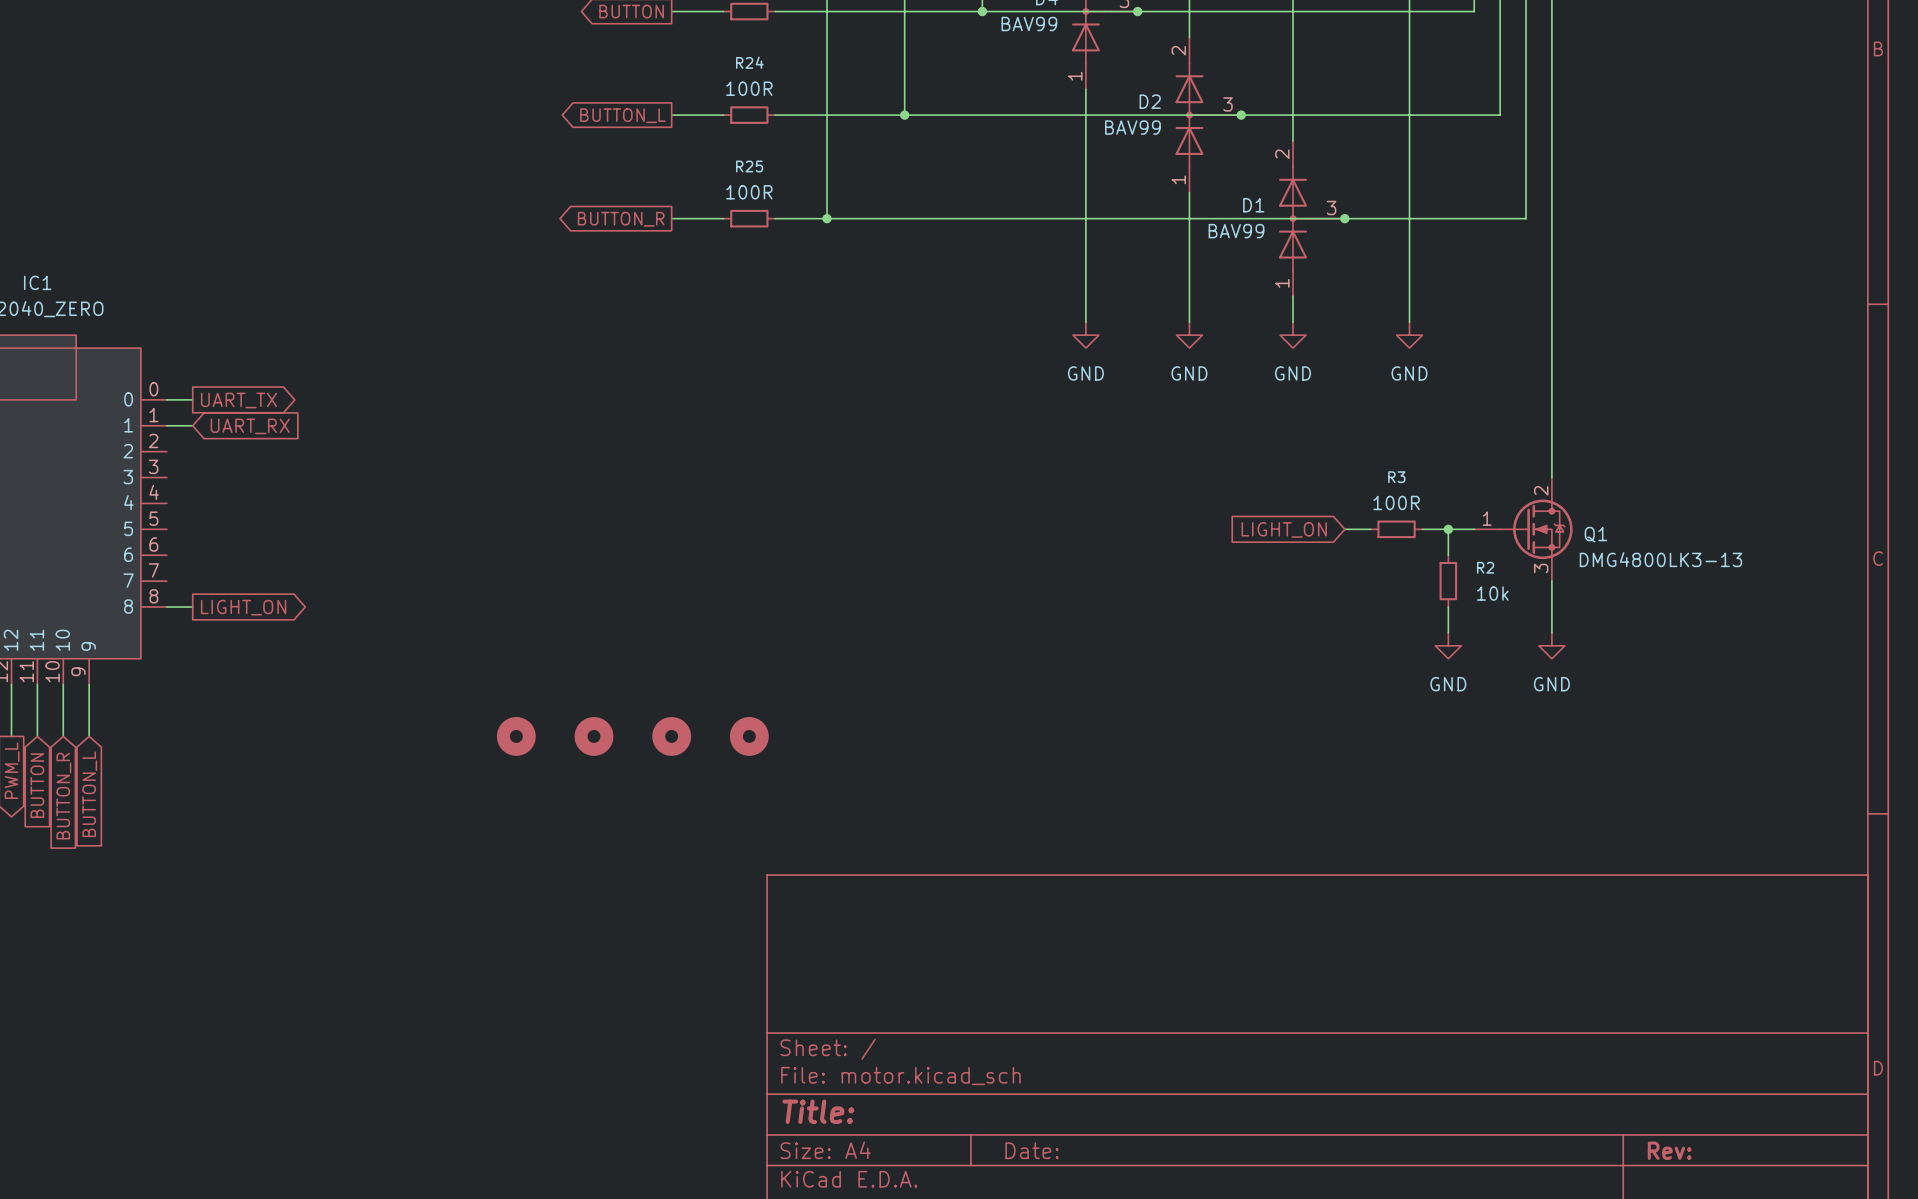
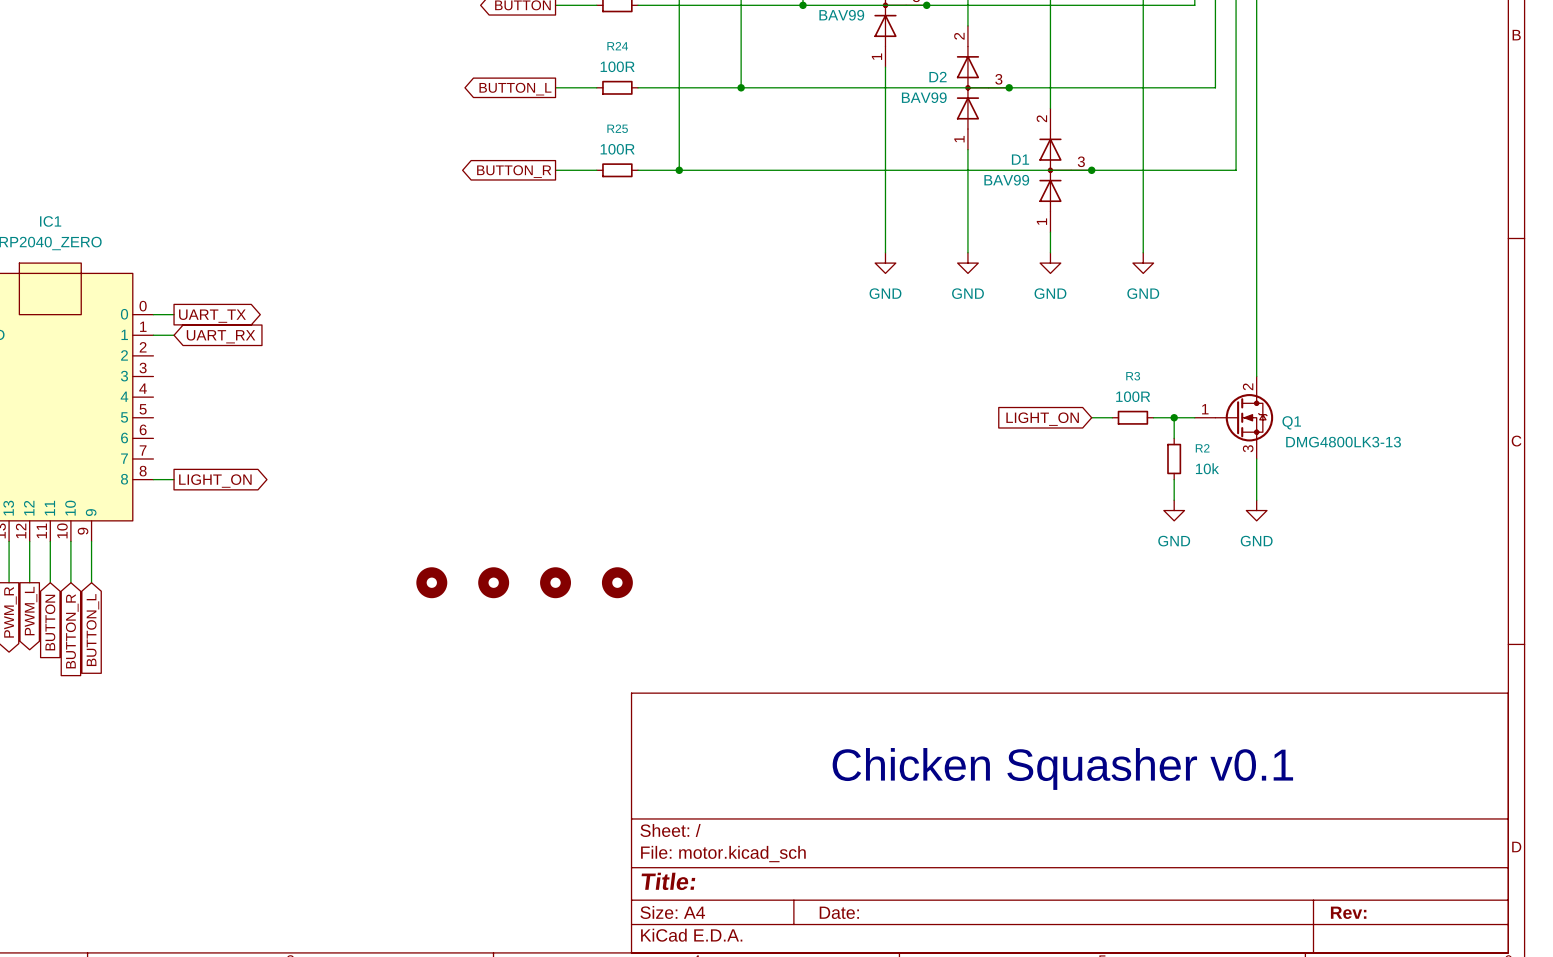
text: none -> Chicken Squasher v0.1 (1062, 768)

